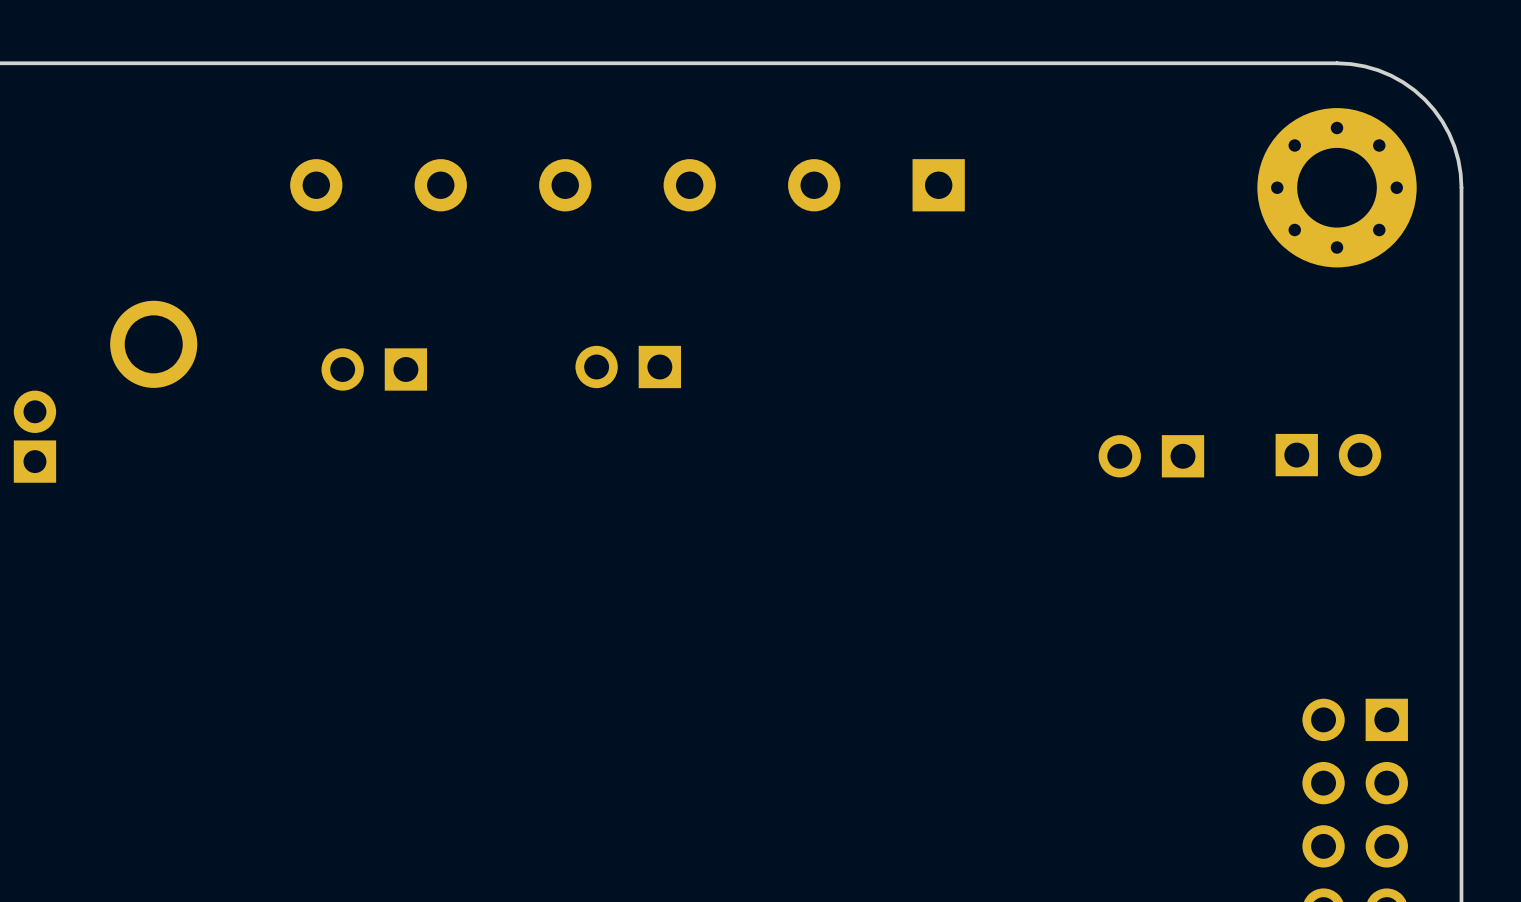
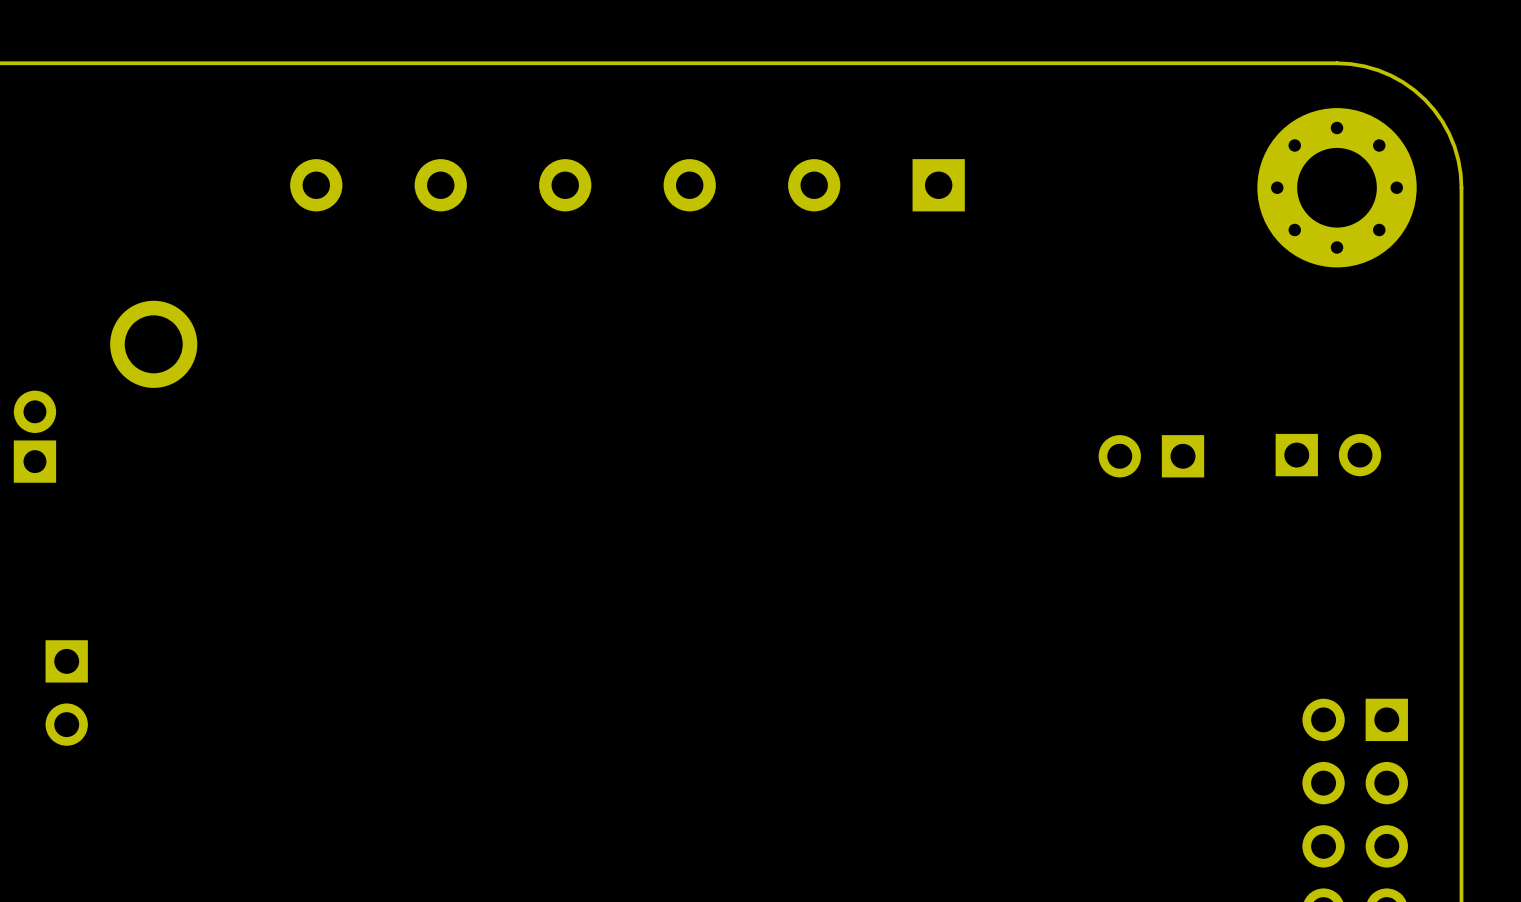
part: (628, 366) -> none
part: (374, 369) -> none
part: none -> (66, 693)

